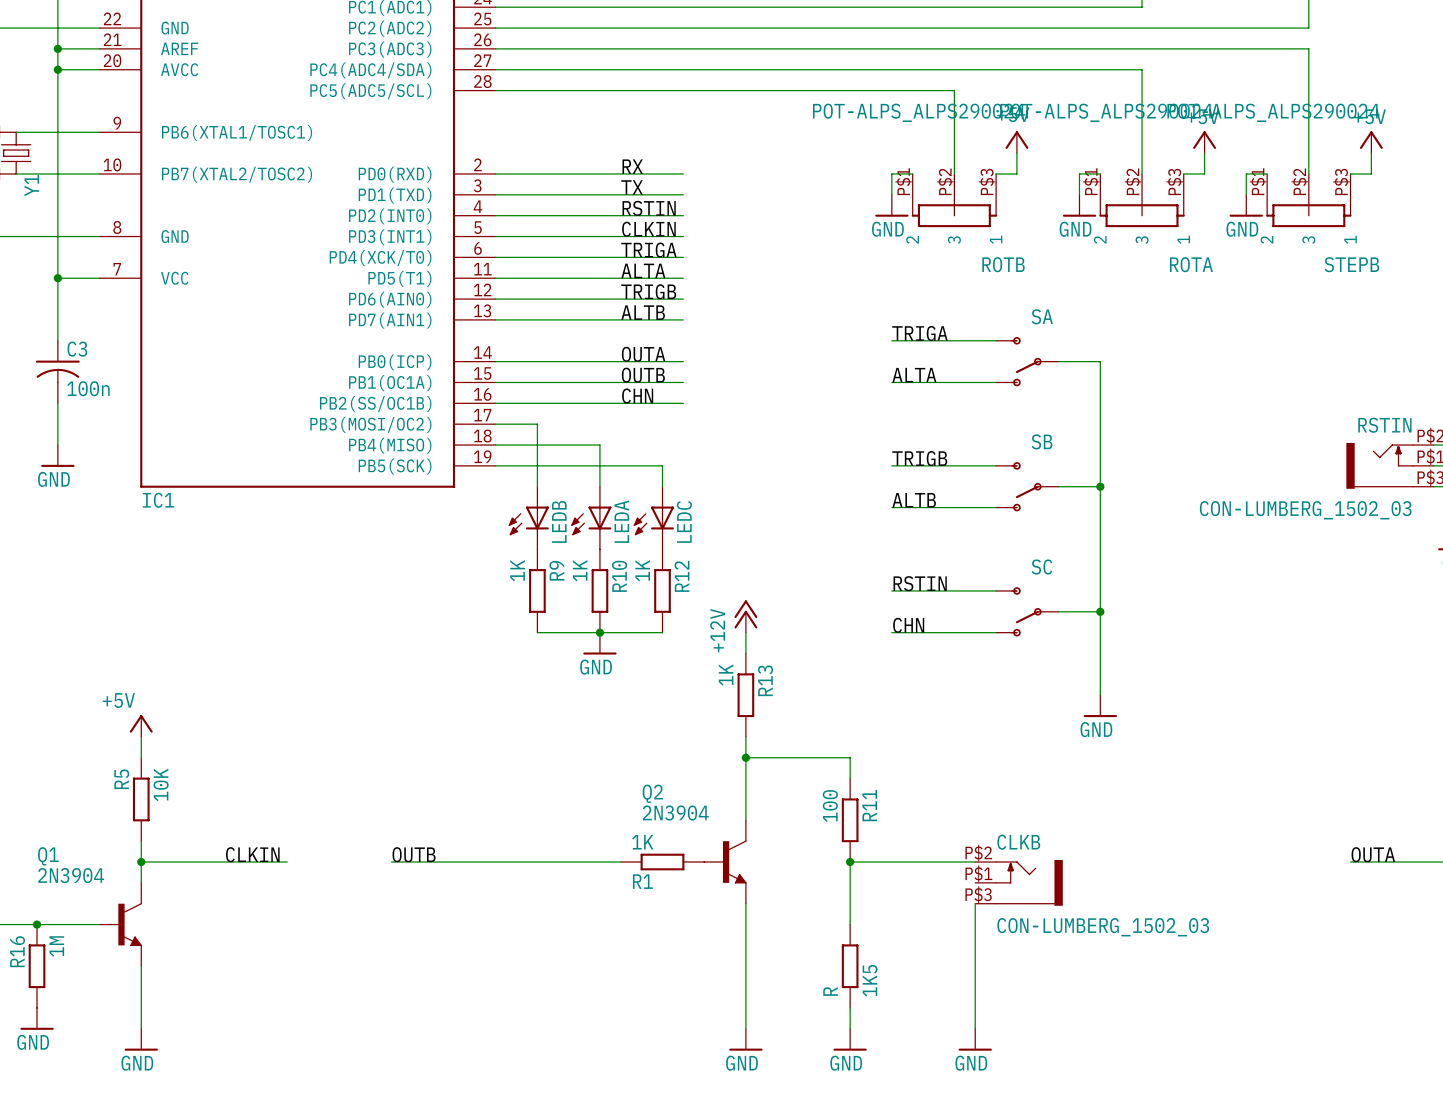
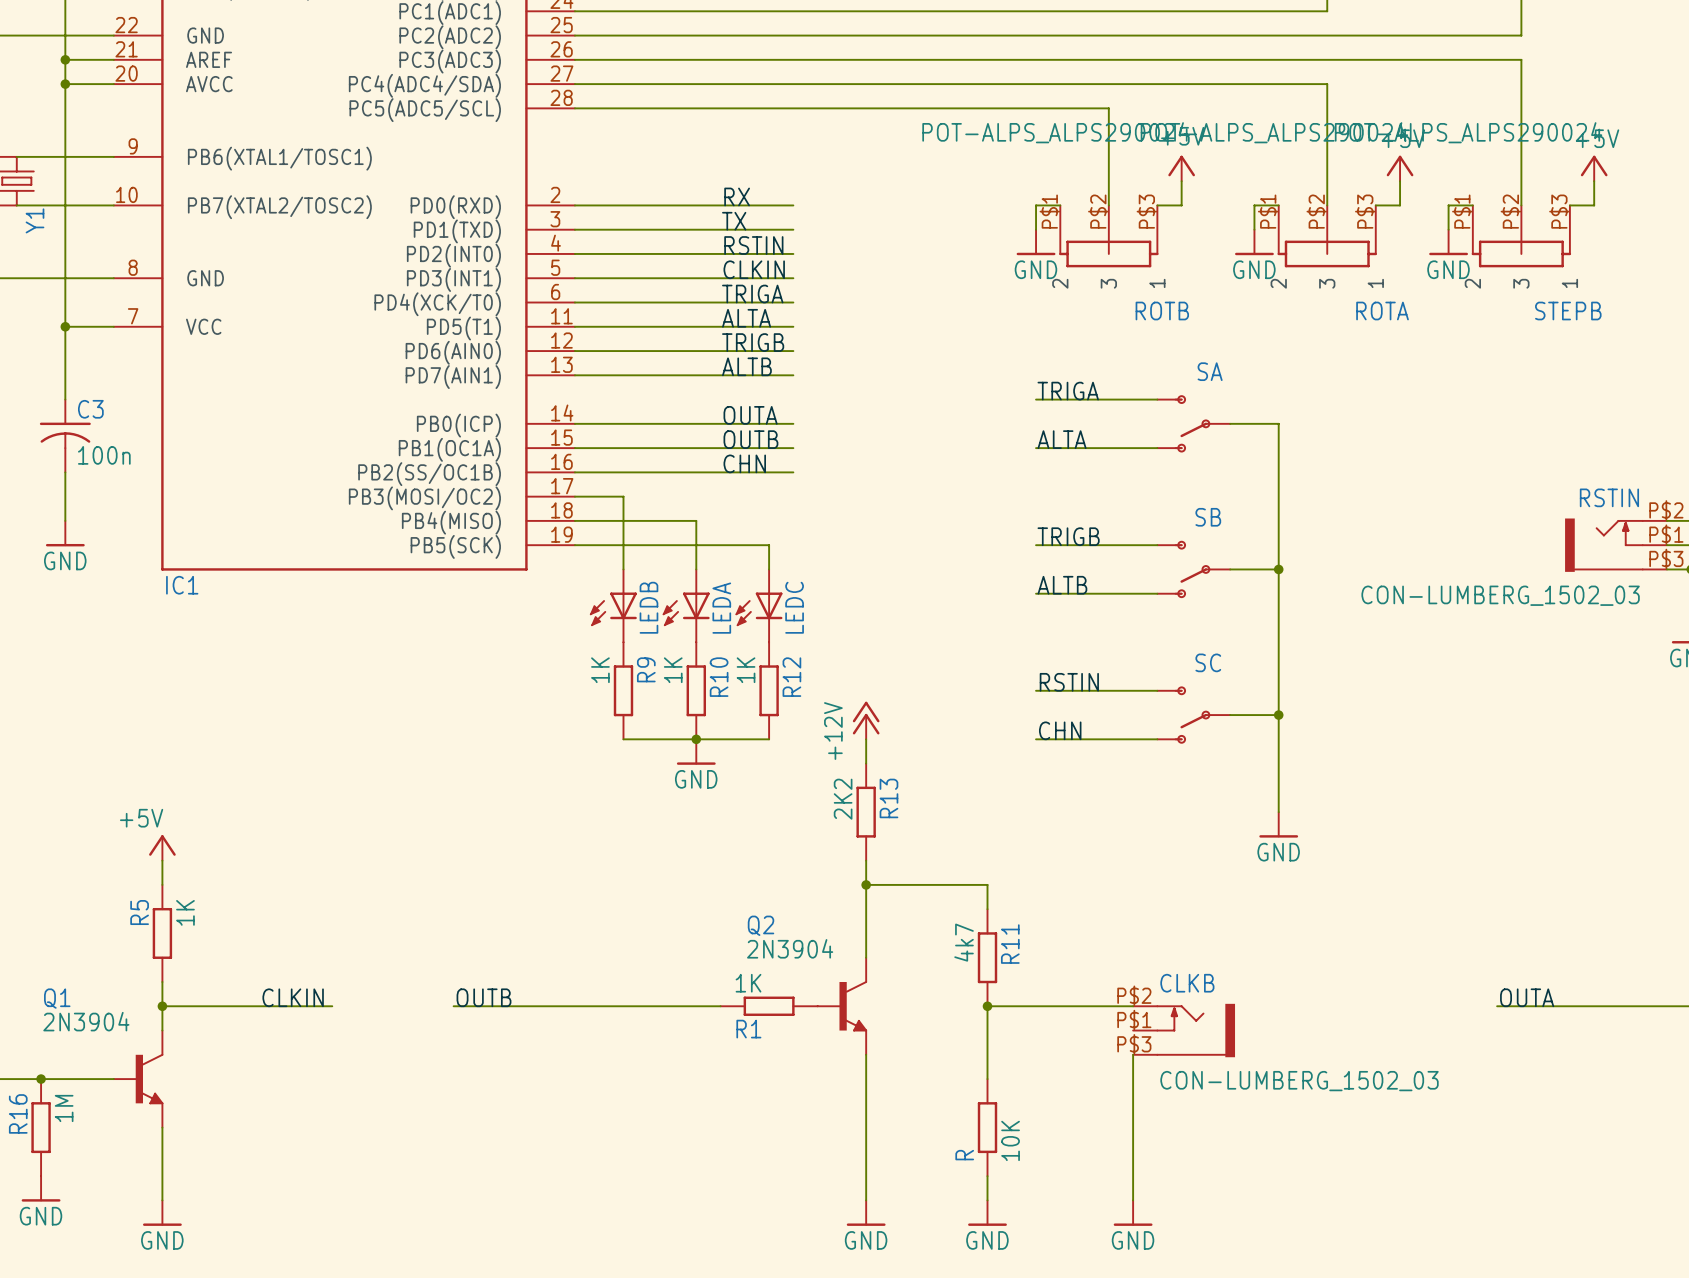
R13 value: 1K (726, 674) -> 2K2 (843, 799)
R5 value: 10K (161, 784) -> 1K (185, 912)
R11 value: 100 (830, 806) -> 4k7 (964, 942)
label position: OUTA (1373, 854) -> OUTA (1527, 997)
wire: none -> (1497, 1006) (1569, 1006)
R value: 1K5 (870, 980) -> 10K (1010, 1140)

